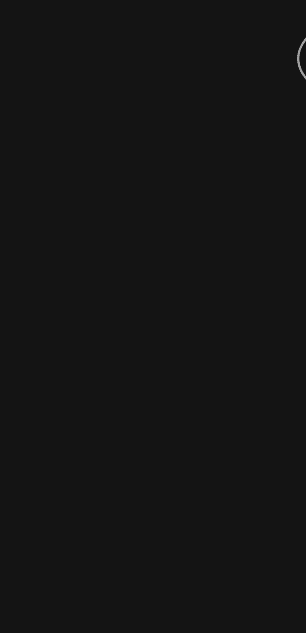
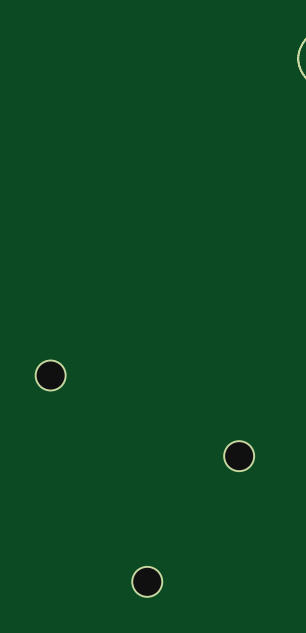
part: none -> (50, 375)
part: none -> (239, 456)
part: none -> (147, 581)

